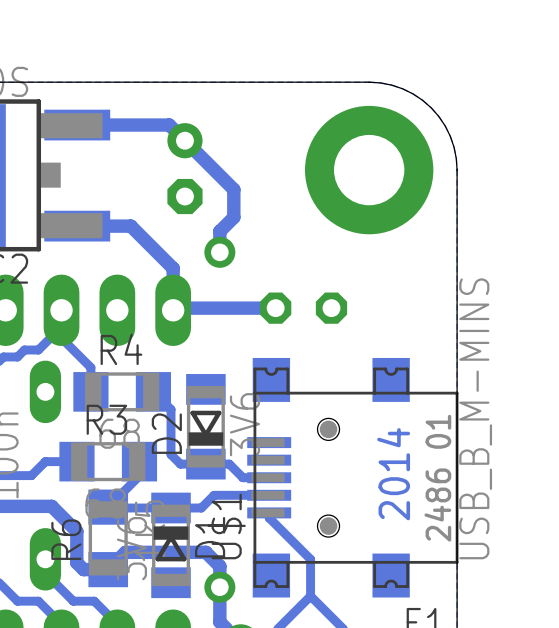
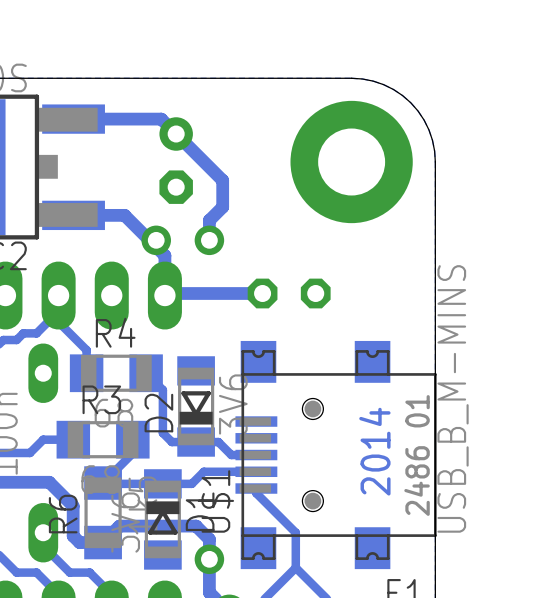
via: none -> (156, 240)

